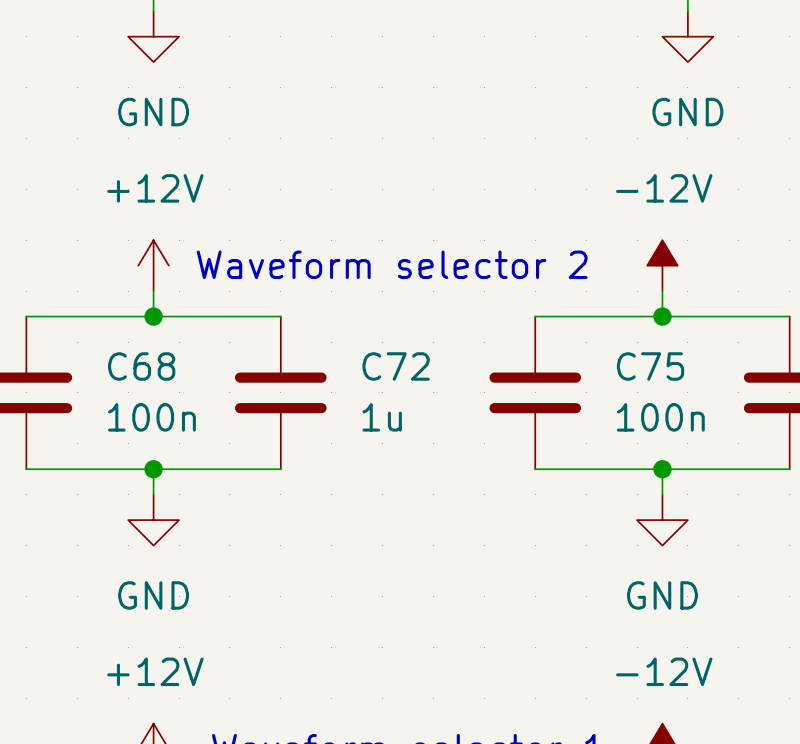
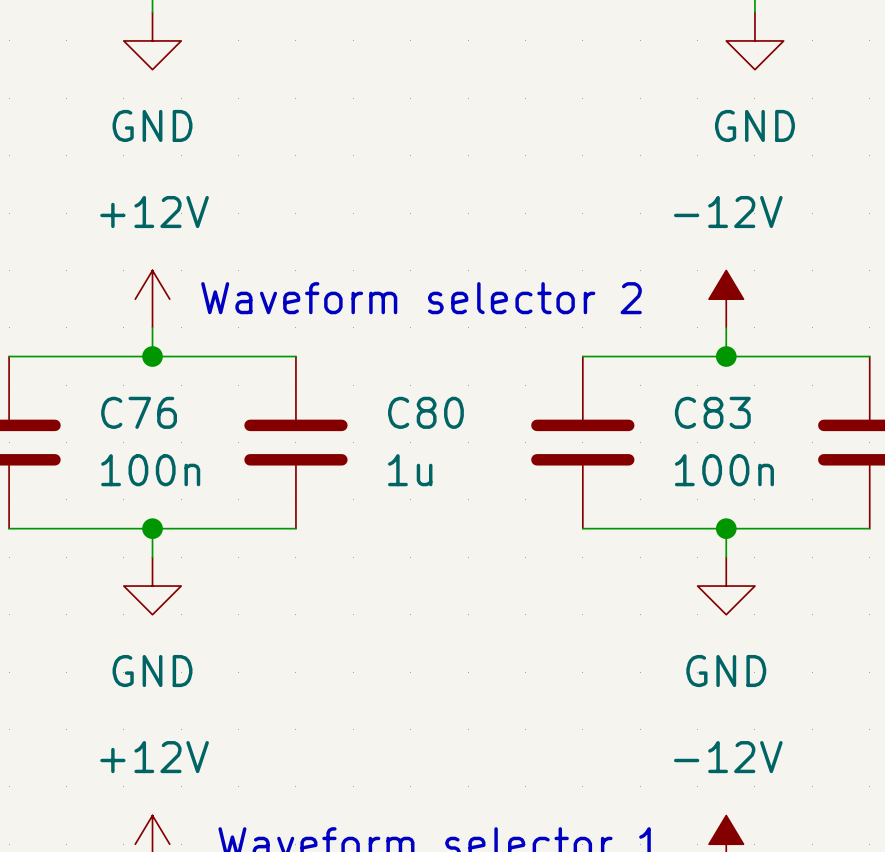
C68 name: C68 (141, 366) -> C76 (139, 412)
C72 name: C72 (396, 366) -> C80 (425, 412)
C75 name: C75 (650, 366) -> C83 (712, 412)

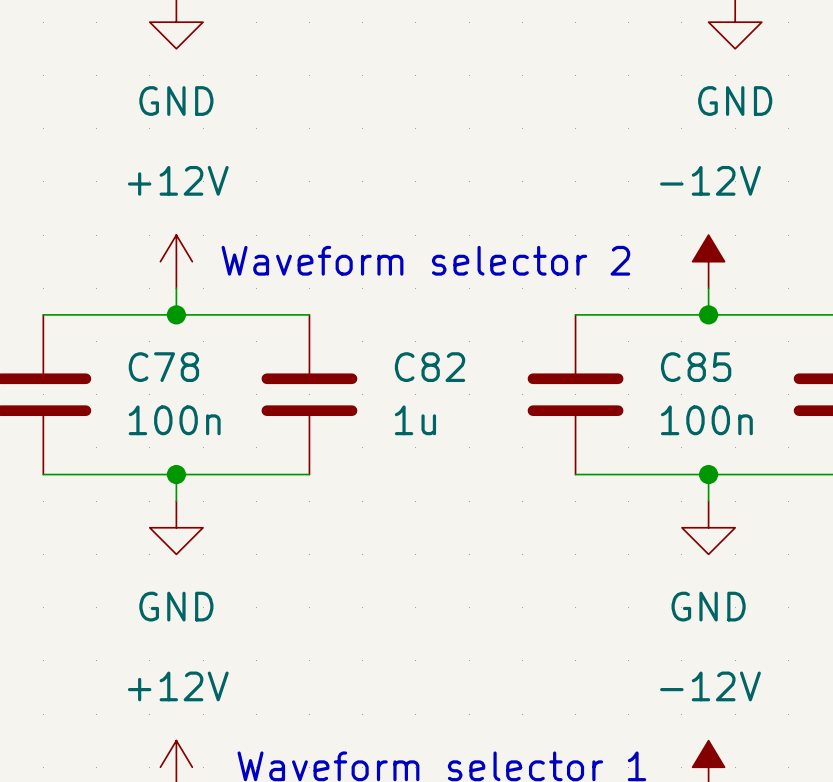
C76 name: C76 (139, 412) -> C78 (163, 367)
C80 name: C80 (425, 412) -> C82 (430, 367)
C83 name: C83 (712, 412) -> C85 (696, 367)

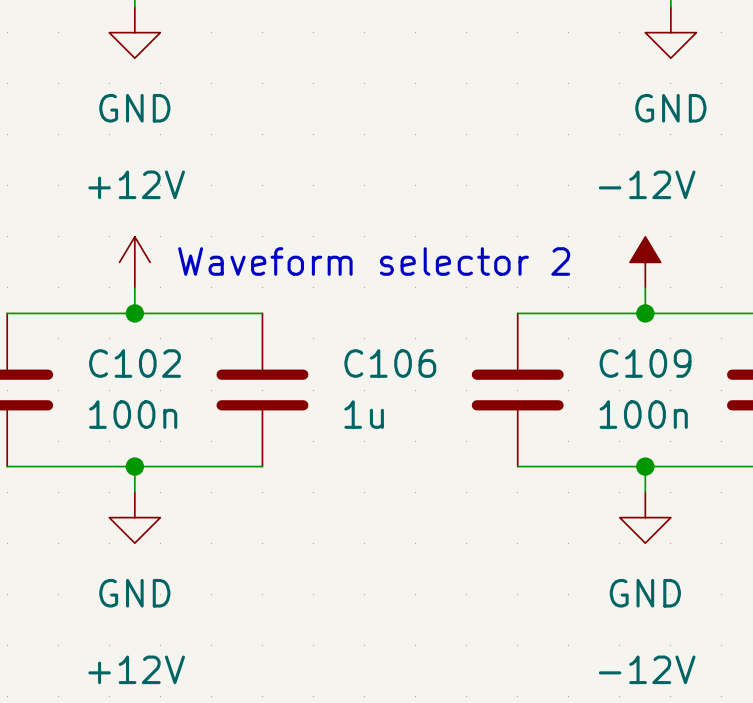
C78 name: C78 (163, 367) -> C102 (135, 363)
C82 name: C82 (430, 367) -> C106 (390, 363)
C85 name: C85 (696, 367) -> C109 (645, 363)

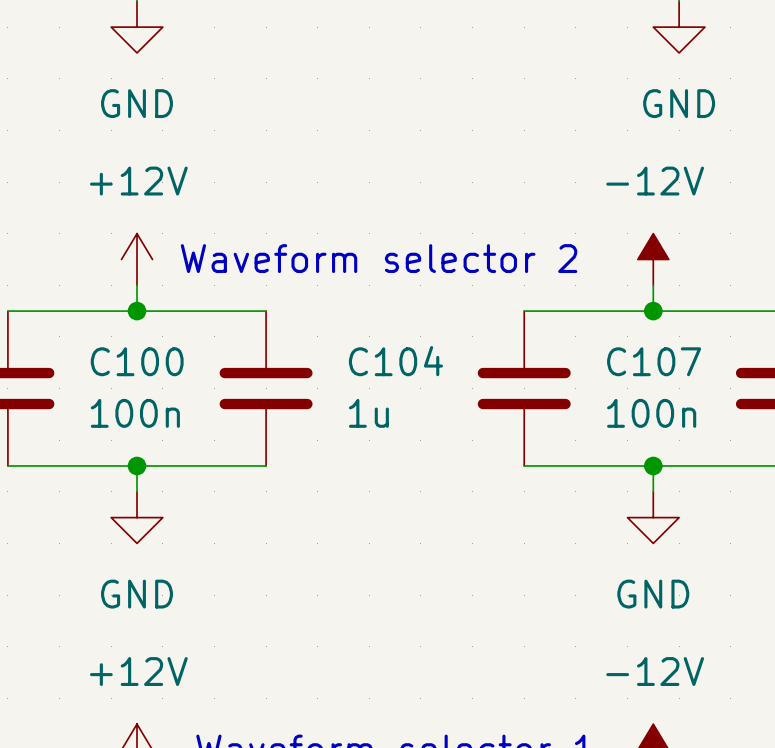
C102 name: C102 (135, 363) -> C100 (137, 361)
C106 name: C106 (390, 363) -> C104 (395, 361)
C109 name: C109 (645, 363) -> C107 (654, 361)

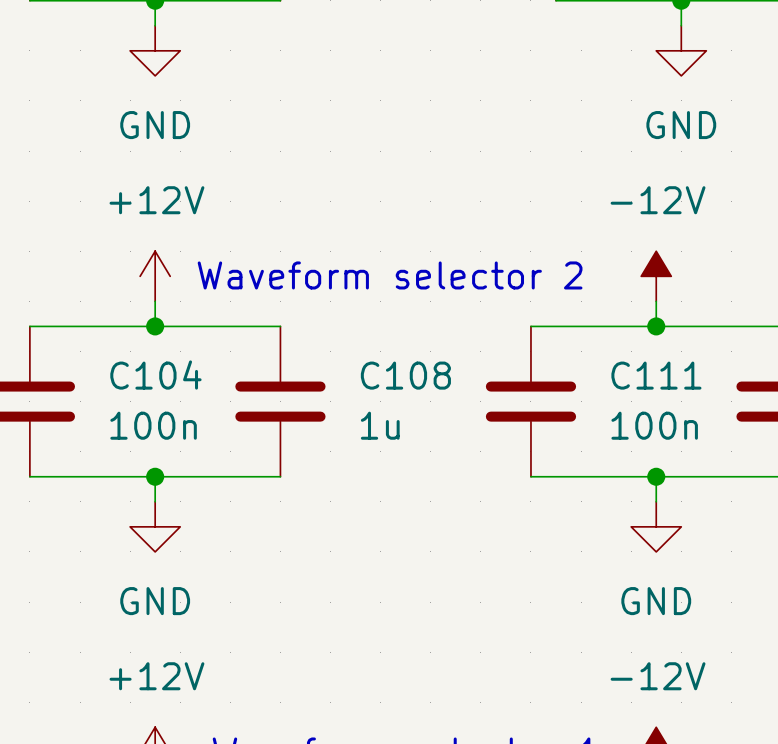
C100 name: C100 (137, 361) -> C104 (155, 375)
C104 name: C104 (395, 361) -> C108 (405, 375)
C107 name: C107 (654, 361) -> C111 (656, 375)

